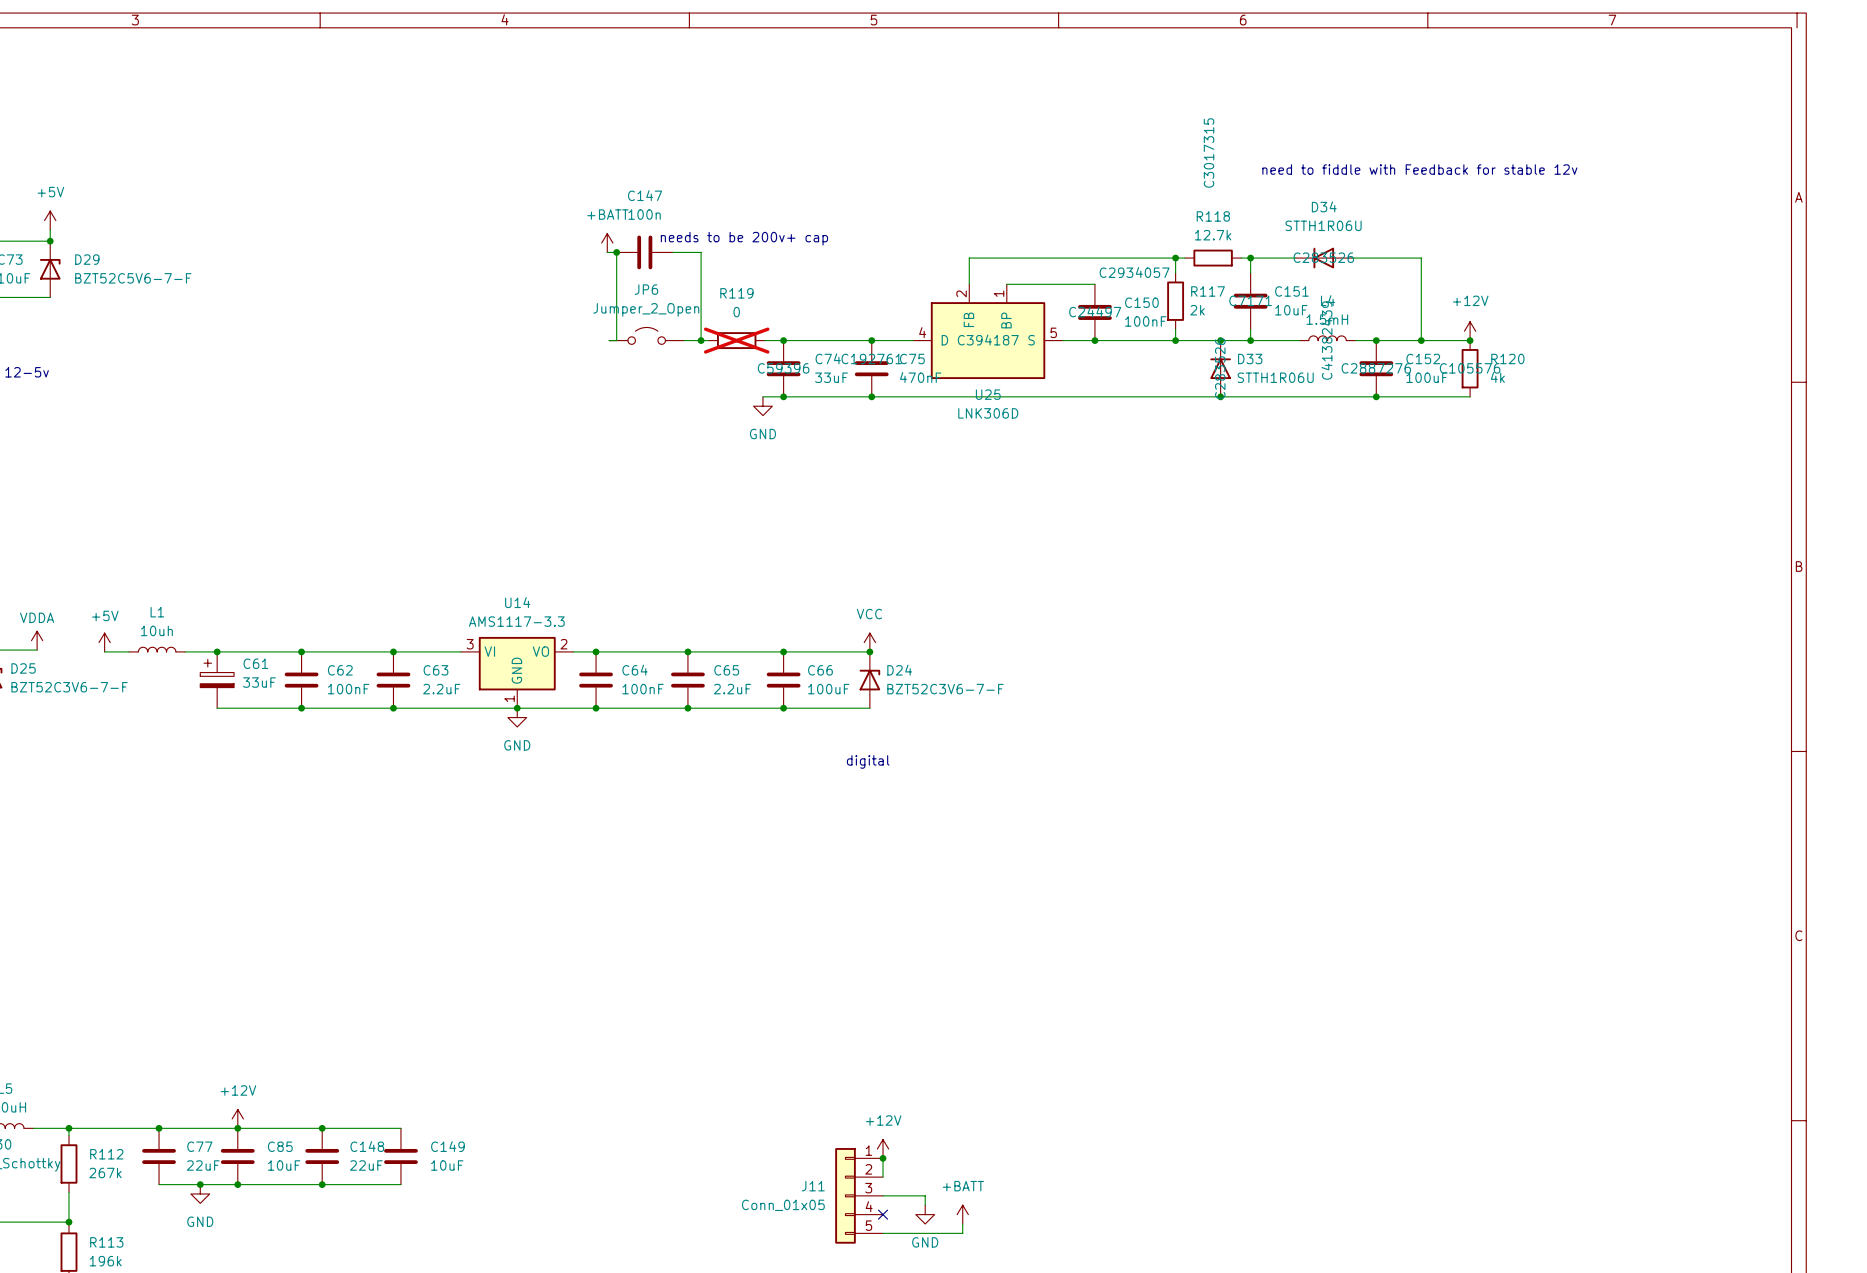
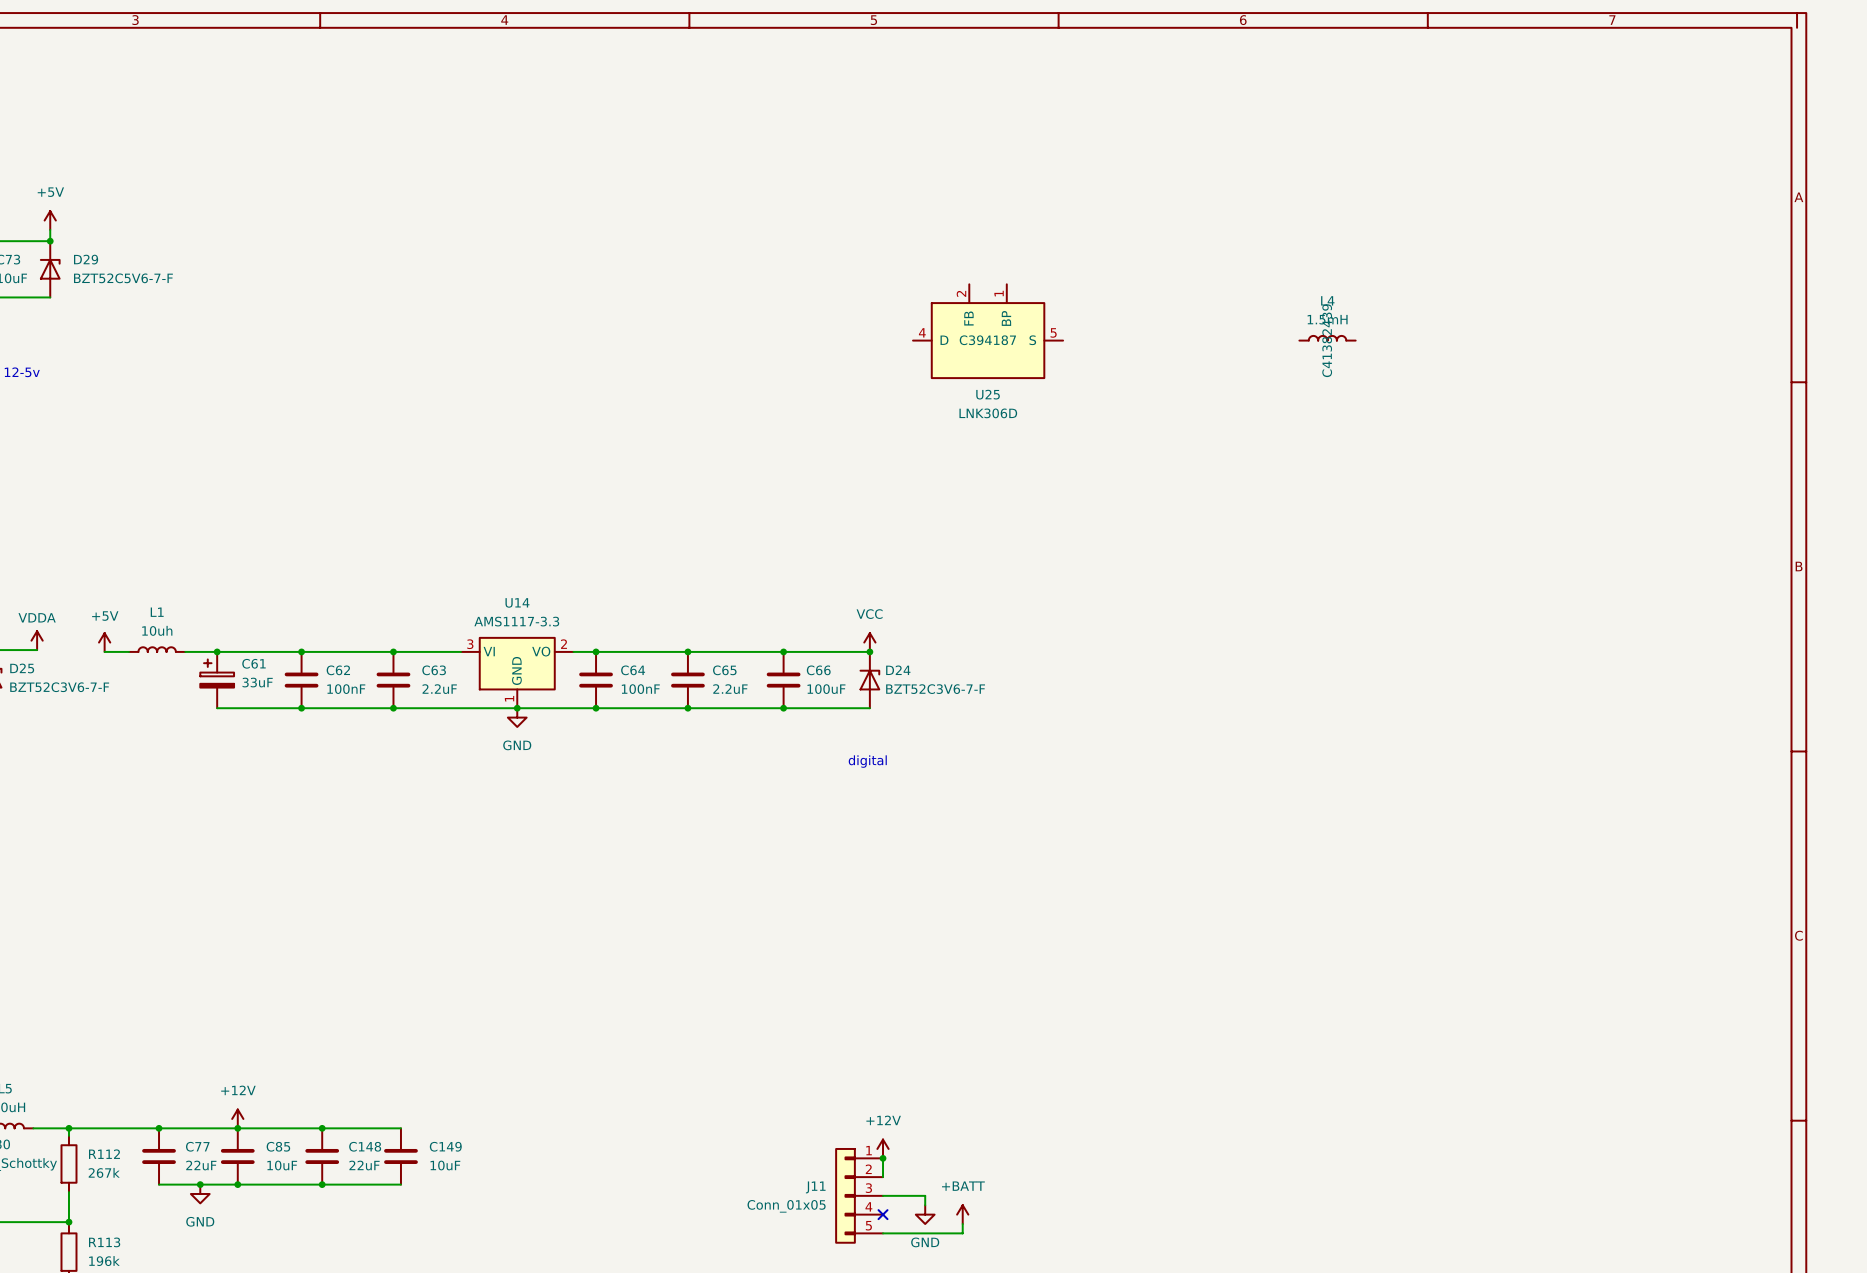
text: need to fiddle with Feedback for stable 12v (1419, 169) -> none
text: needs to be 200v+ cap (744, 238) -> none
power symbol: +BATT (607, 243) -> none
wire: (607, 252) (616, 252) (616, 340) (609, 340) -> none
junction: (616, 252) -> none
C147: 100n (644, 252) -> none
wire: (672, 252) (701, 252) (701, 340) -> none
wire: (1175, 258) (1175, 273) -> none
junction: (1175, 258) -> none
wire: (1184, 258) (969, 258) (969, 284) -> none
R118: 12.7k (1213, 258) -> none
wire: (1241, 258) (1295, 258) -> none
wire: (1250, 258) (1250, 273) -> none
junction: (1250, 258) -> none
D34: STTH1R06U (1323, 258) -> none
wire: (1351, 258) (1421, 258) (1421, 340) -> none
wire: (1006, 284) (1094, 284) -> none
R117: 2k (1175, 301) -> none
C151: 10uF (1250, 301) -> none
C150: 100nF (1094, 312) -> none
wire: (1175, 329) (1175, 340) -> none
wire: (1250, 329) (1250, 340) -> none
power symbol: +12V (1470, 331) -> none
JP6: Jumper_2_Open (646, 335) -> none
wire: (684, 340) (708, 340) -> none
junction: (701, 340) -> none
R119: 0 (736, 340) -> none
wire: (764, 340) (913, 340) -> none
junction: (783, 340) -> none
junction: (871, 340) -> none
wire: (1063, 340) (1299, 340) -> none
junction: (1094, 340) -> none
junction: (1175, 340) -> none
junction: (1220, 340) -> none
junction: (1250, 340) -> none
wire: (1355, 340) (1470, 340) -> none
junction: (1376, 340) -> none
junction: (1421, 340) -> none
junction: (1470, 340) -> none
C74: 33uF (783, 368) -> none
C75: 470nF (871, 368) -> none
D33: STTH1R06U (1220, 368) -> none
C152: 100uF (1376, 368) -> none
R120: 4k (1470, 368) -> none
wire: (762, 396) (1470, 396) -> none
junction: (783, 396) -> none
junction: (871, 396) -> none
junction: (1220, 396) -> none
junction: (1376, 396) -> none
power symbol: GND (762, 406) -> none

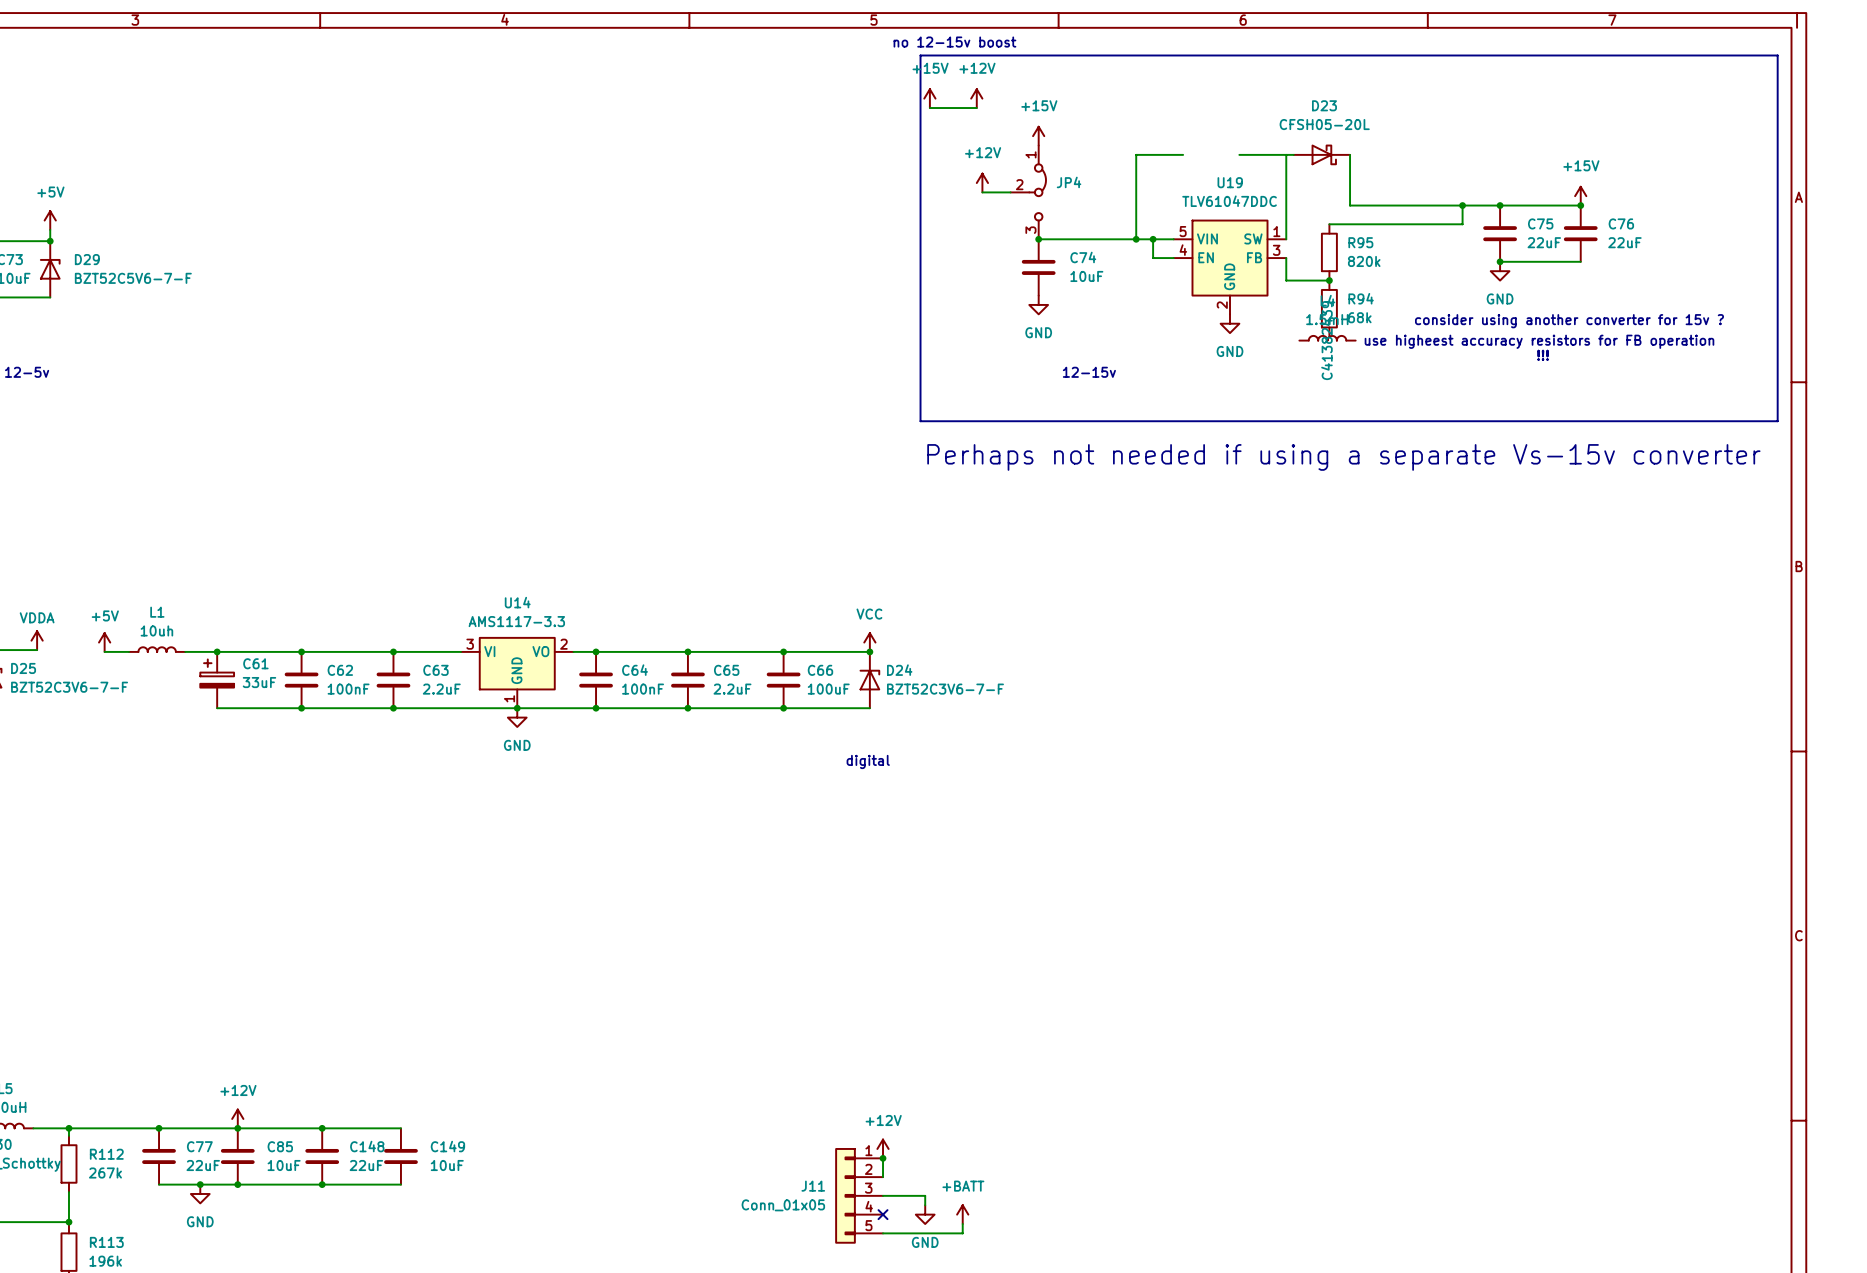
text: none -> no 12-15v boost (954, 42)
line: none -> (920, 55) (1777, 55) (1777, 421) (920, 421) (920, 55)
power symbol: none -> +15V (929, 98)
power symbol: none -> +12V (976, 98)
wire: none -> (929, 108) (976, 108)
power symbol: none -> +15V (1038, 136)
wire: none -> (1183, 154) (1136, 154) (1136, 239)
wire: none -> (1239, 154) (1293, 154)
wire: none -> (1286, 154) (1286, 239)
D23: none -> CFSH05-20L (1321, 154)
wire: none -> (1350, 154) (1350, 205) (1580, 205)
power symbol: none -> +12V (982, 183)
wire: none -> (982, 192) (1010, 192)
JP4: none -> (1028, 192)
power symbol: none -> +15V (1580, 196)
wire: none -> (1462, 205) (1462, 224) (1329, 224)
junction: none -> (1462, 205)
junction: none -> (1500, 205)
junction: none -> (1580, 205)
C75: none -> 22uF (1500, 233)
C76: none -> 22uF (1580, 233)
wire: none -> (1038, 239) (1173, 239)
junction: none -> (1038, 239)
junction: none -> (1136, 239)
wire: none -> (1153, 239) (1153, 258) (1173, 258)
junction: none -> (1153, 239)
R95: none -> 820k (1329, 252)
wire: none -> (1286, 258) (1286, 280) (1329, 280)
wire: none -> (1500, 261) (1580, 261)
junction: none -> (1500, 261)
U19: none -> TLV61047DDC (1230, 266)
C74: none -> 10uF (1038, 267)
power symbol: none -> GND (1500, 271)
junction: none -> (1329, 280)
power symbol: none -> GND (1038, 304)
R94: none -> 68k (1329, 308)
text: none -> consider using another converter for 15v ? (1569, 321)
power symbol: none -> GND (1230, 323)
U25: LNK306D (988, 331) -> none
text: none -> use higheest accuracy resistors for FB operation (1539, 341)
text: none -> !!! (1543, 355)
text: none -> 12-15v (1089, 372)
text: none -> Perhaps not needed if using a separate Vs-15v converter (1343, 457)

